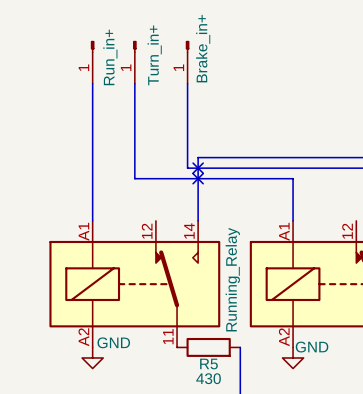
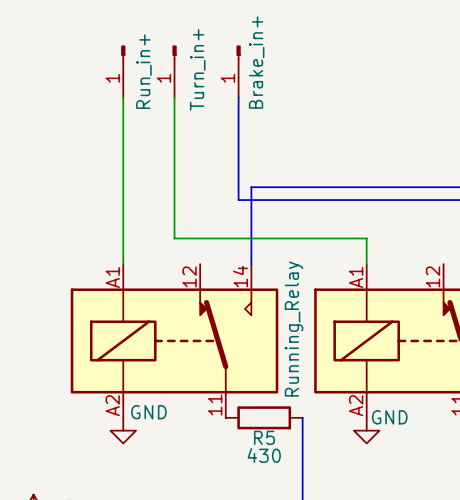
bus: (92, 83) (92, 220) -> none
bus: (134, 83) (134, 178) (293, 178) (293, 220) -> none
wire: none -> (174, 97) (174, 238) (366, 238) (366, 264)
no-connect mark: (198, 168) -> none
no-connect mark: (198, 178) -> none

